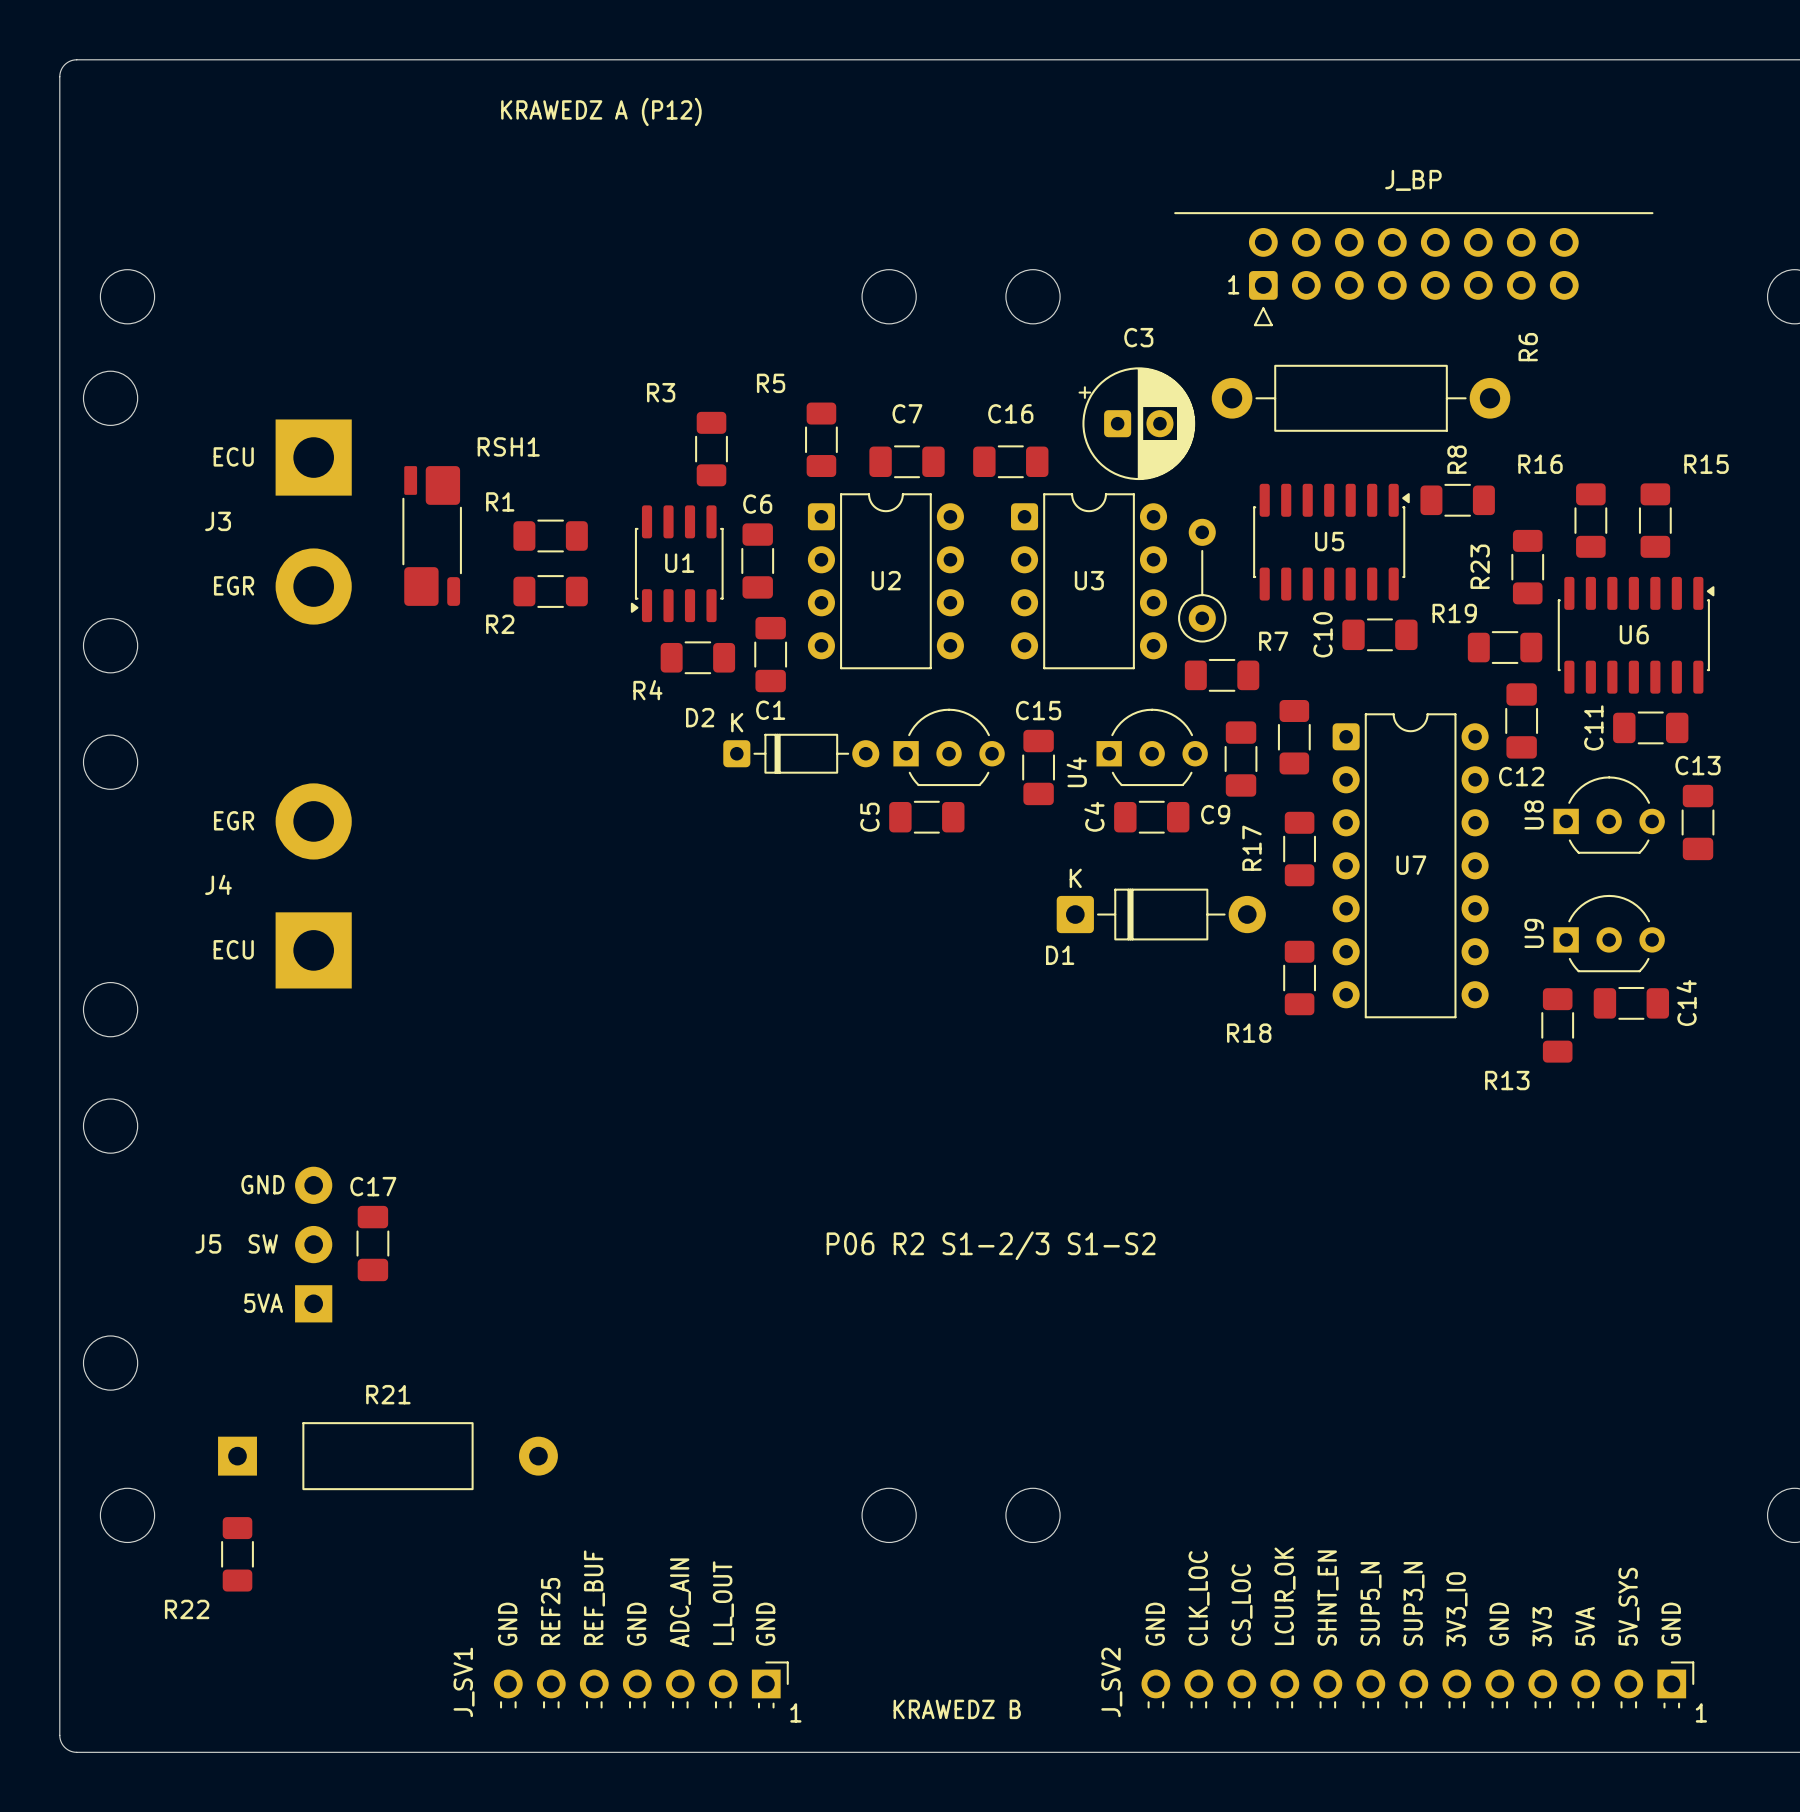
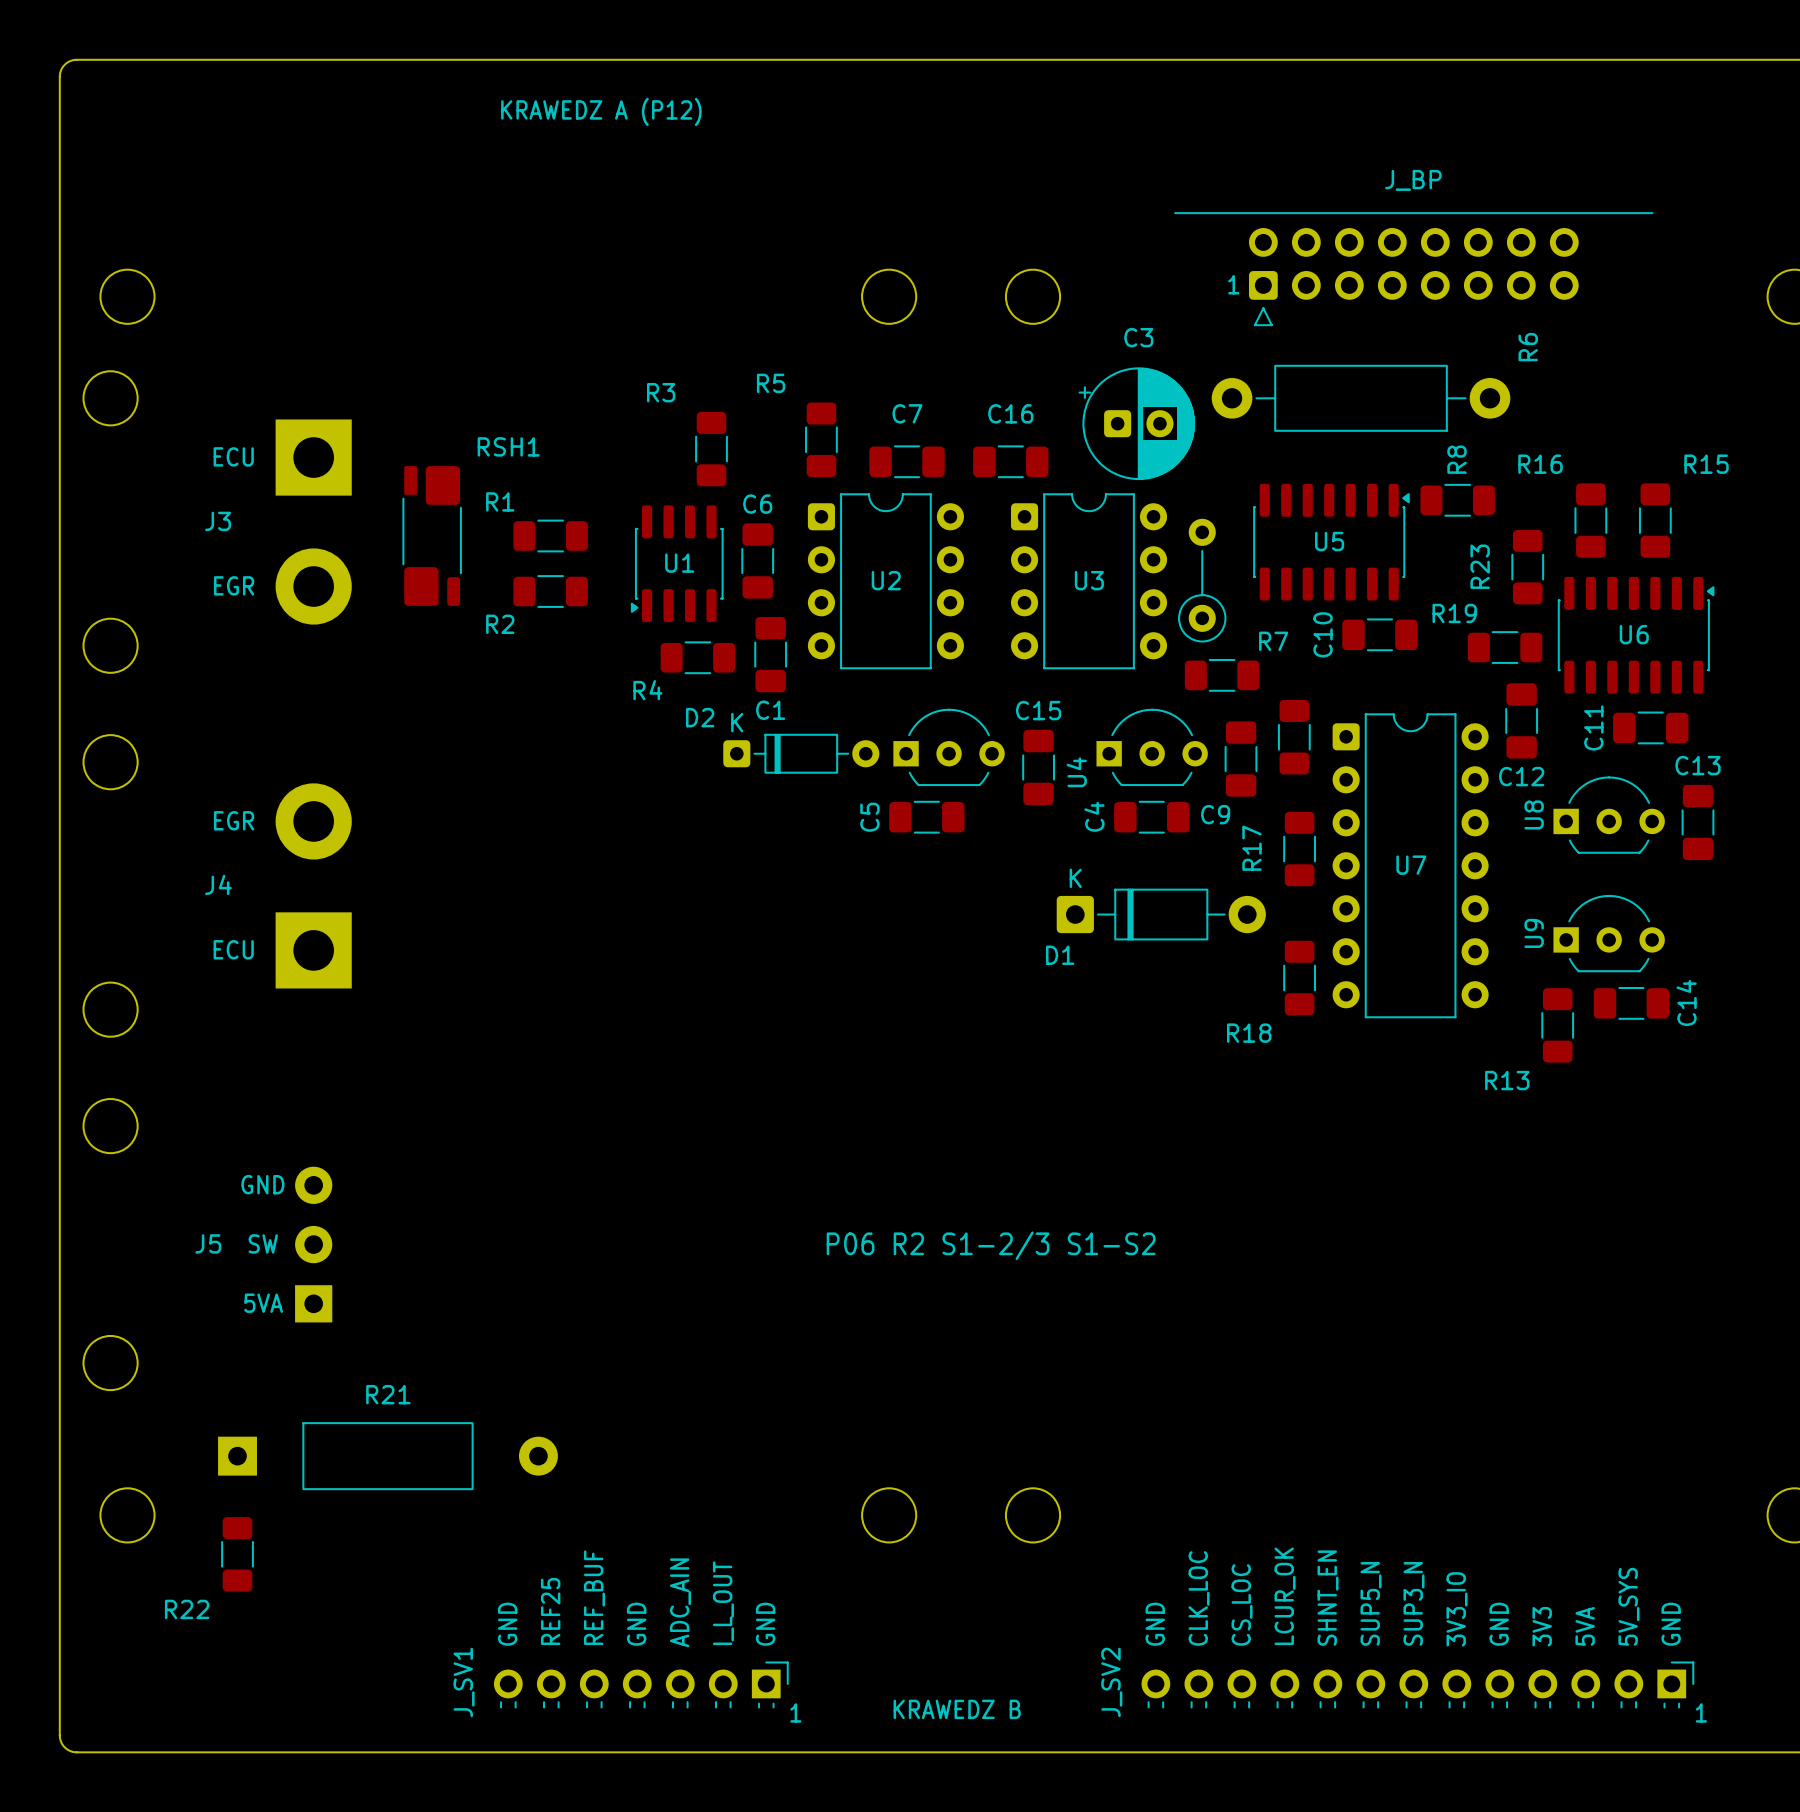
C17: (372, 1243) -> none

